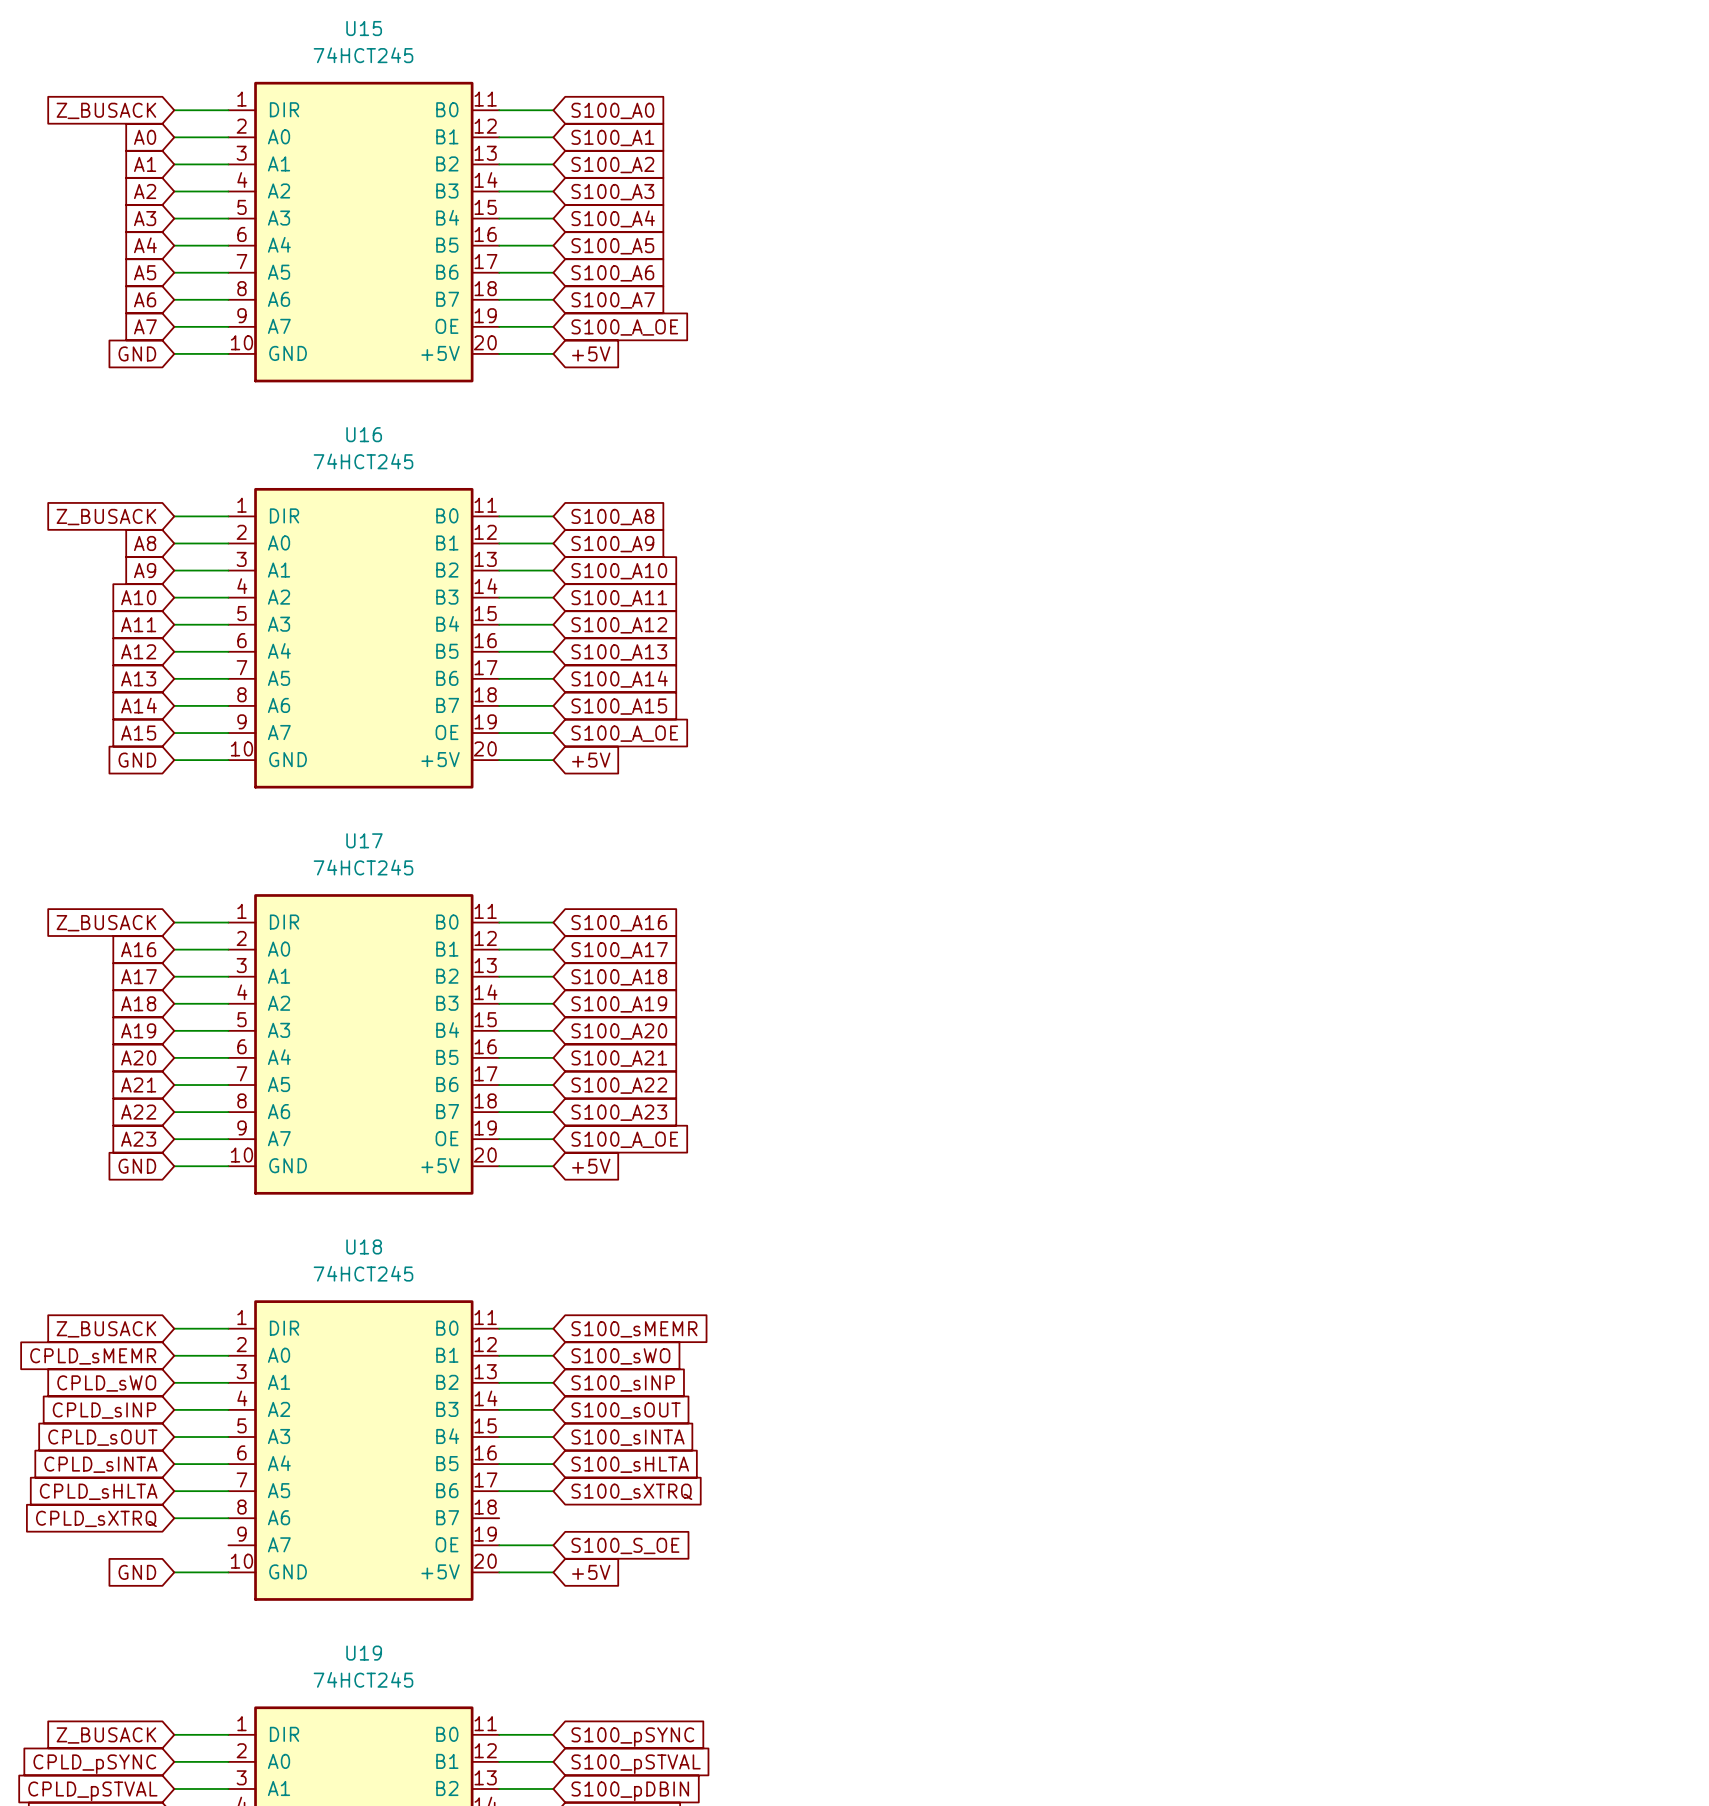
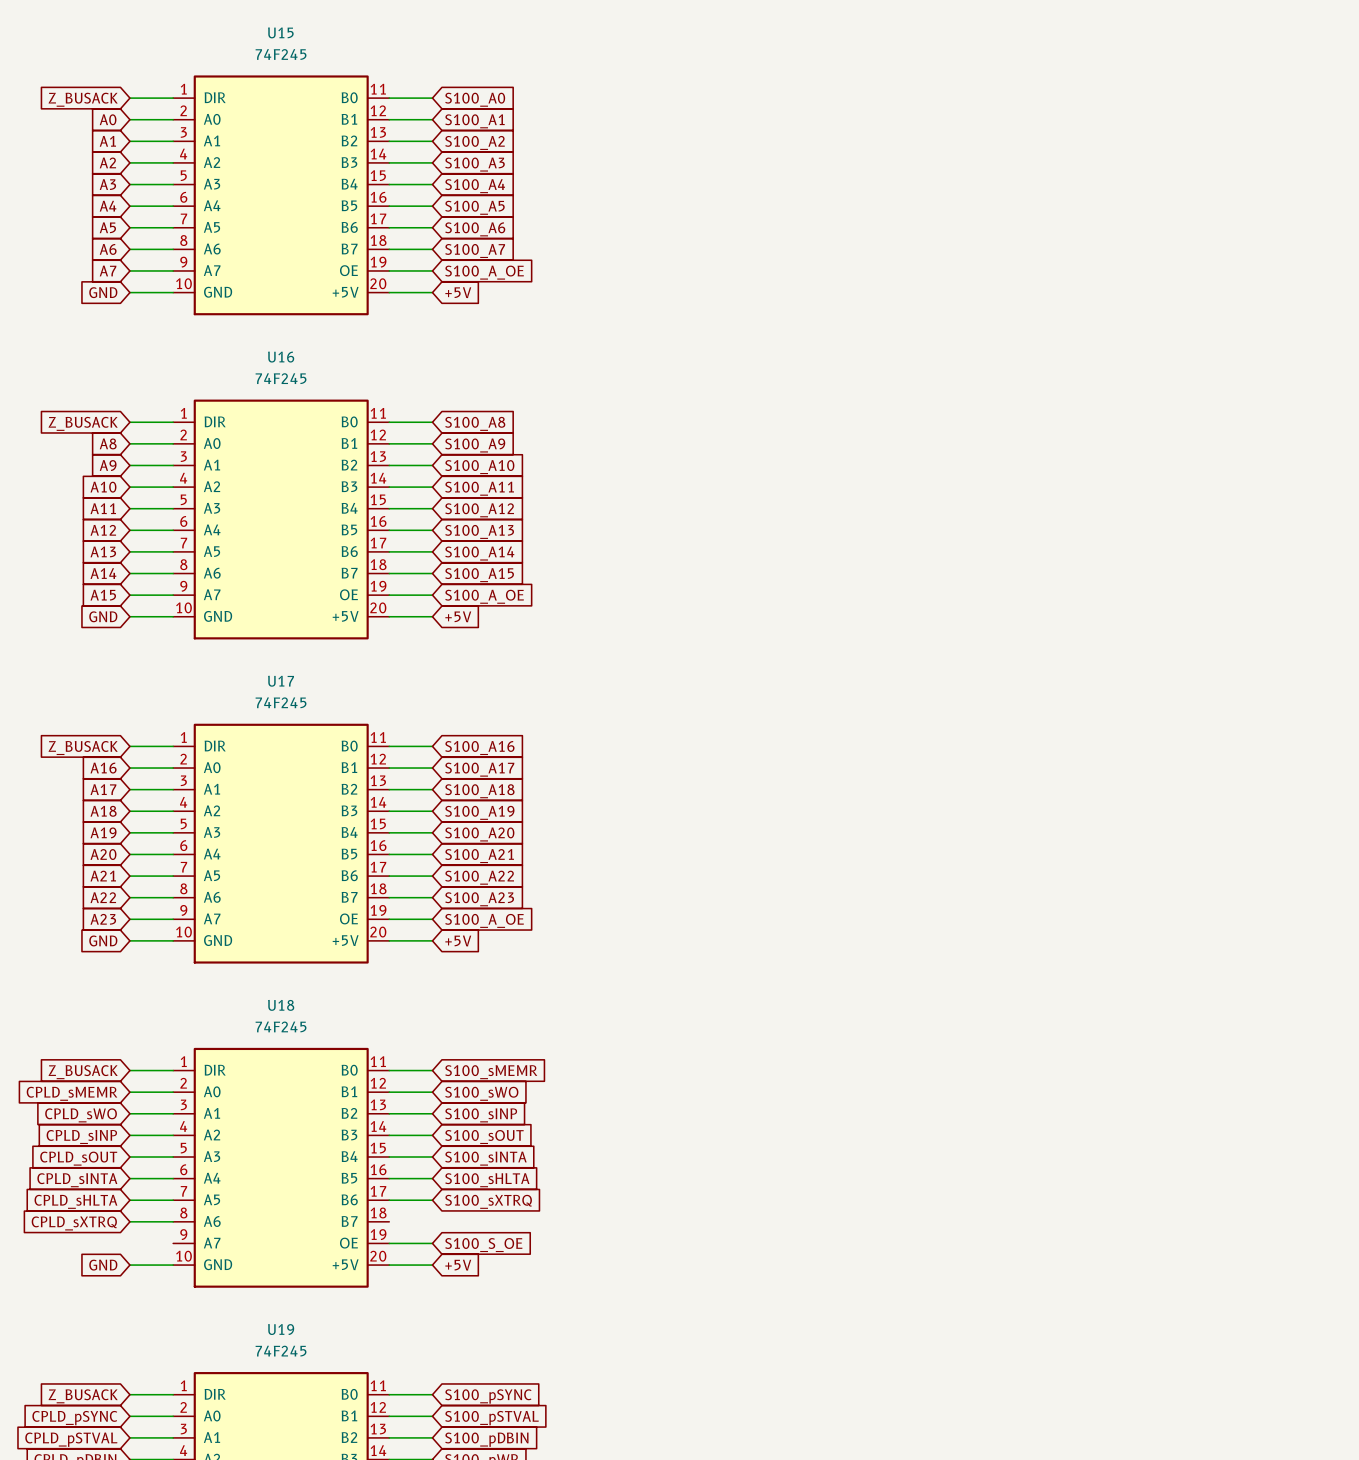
U15 value: 74HCT245 (363, 55) -> 74F245 (281, 54)
U16 value: 74HCT245 (363, 461) -> 74F245 (281, 378)
U17 value: 74HCT245 (363, 867) -> 74F245 (281, 702)
U18 value: 74HCT245 (363, 1273) -> 74F245 (281, 1026)
U19 value: 74HCT245 (363, 1679) -> 74F245 (281, 1351)

